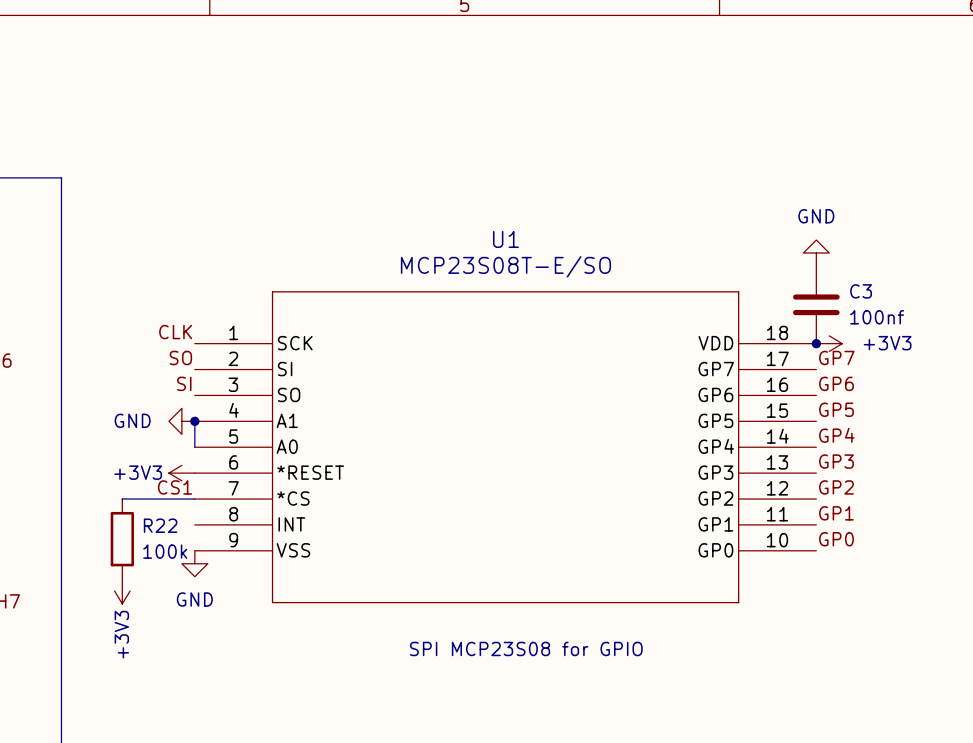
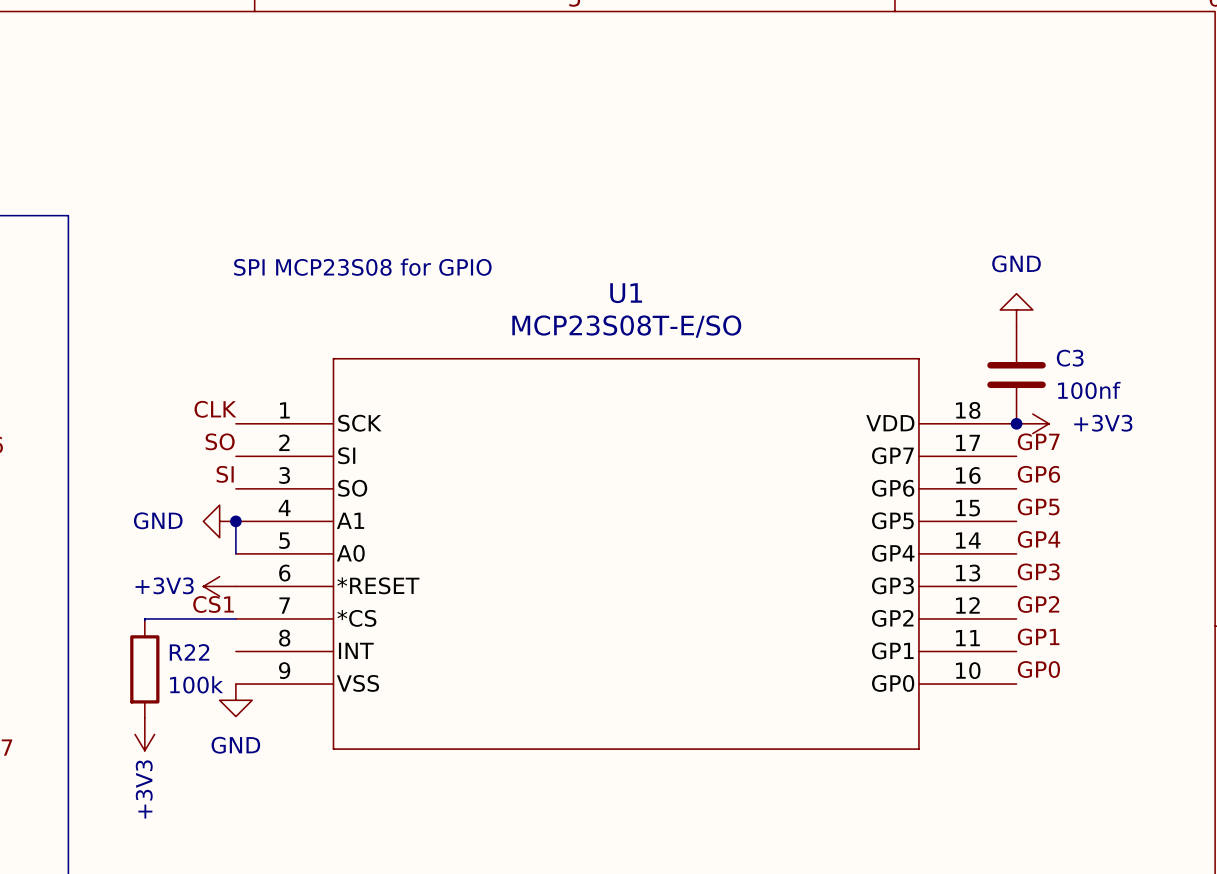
text: none -> SPI MCP23S08 for GPIO (362, 267)
text: SPI MCP23S08 for GPIO (526, 648) -> none

